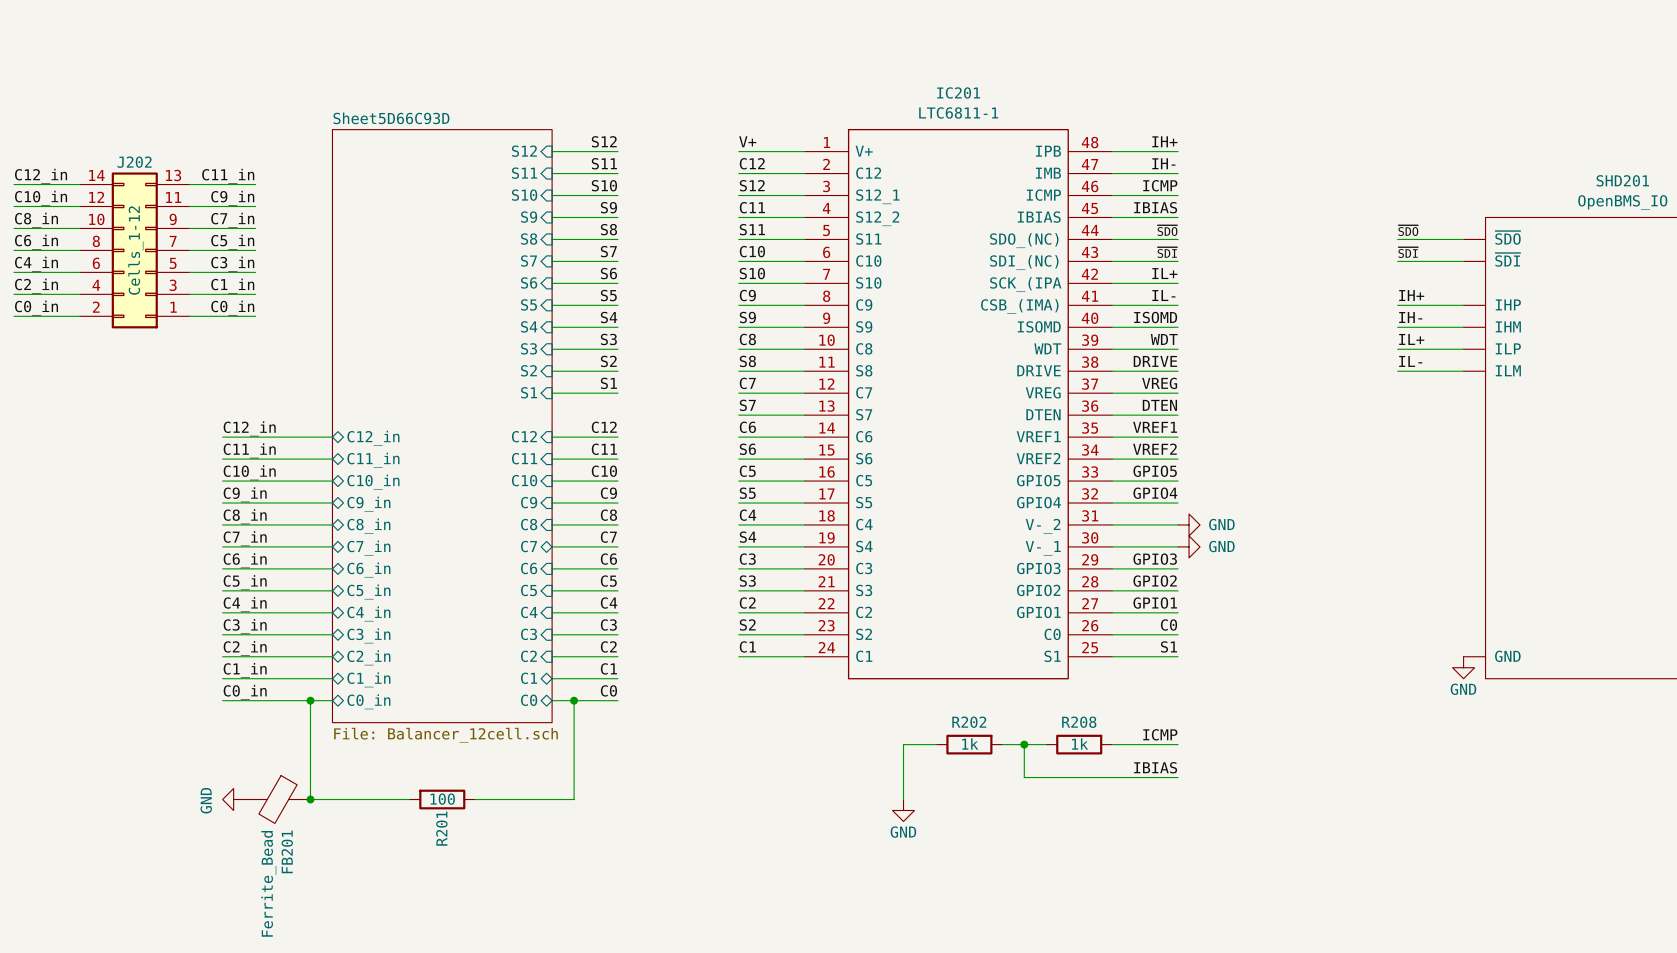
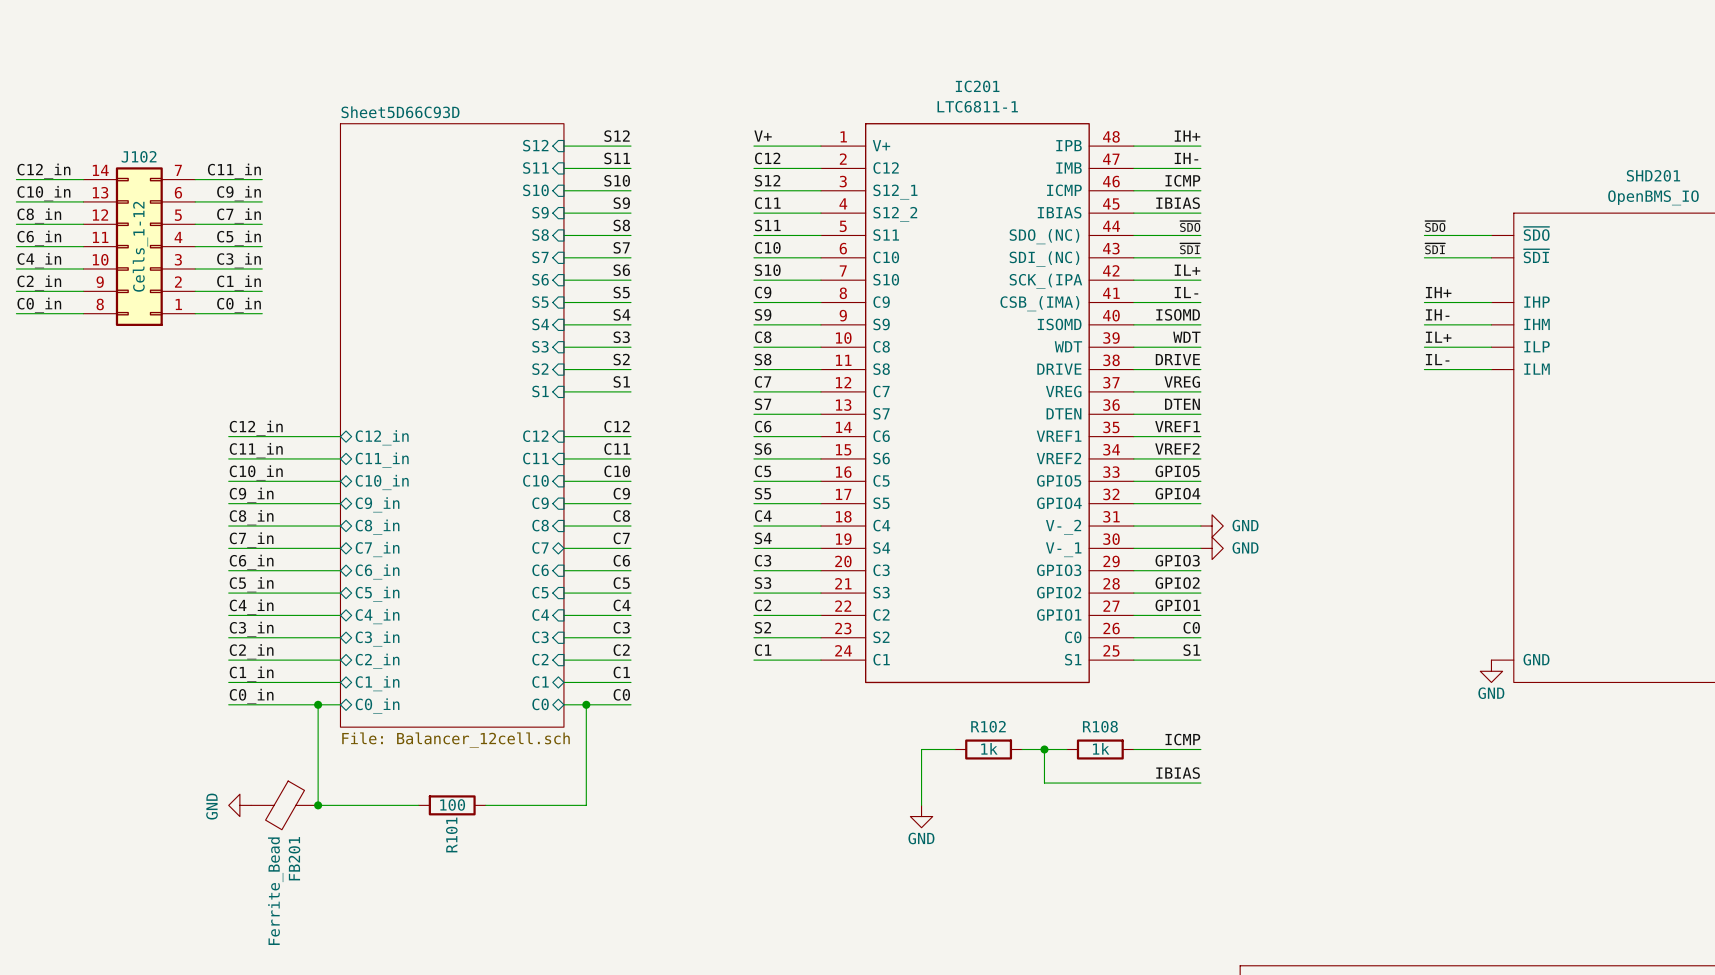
J202 name: J202 (134, 162) -> J102 (139, 156)
J202 symbol: [79, 172, 190, 329] -> [83, 167, 196, 326]
R202 name: R202 (969, 722) -> R102 (988, 726)
R208 name: R208 (1079, 722) -> R108 (1100, 726)
R201 name: R201 (441, 828) -> R101 (451, 834)

